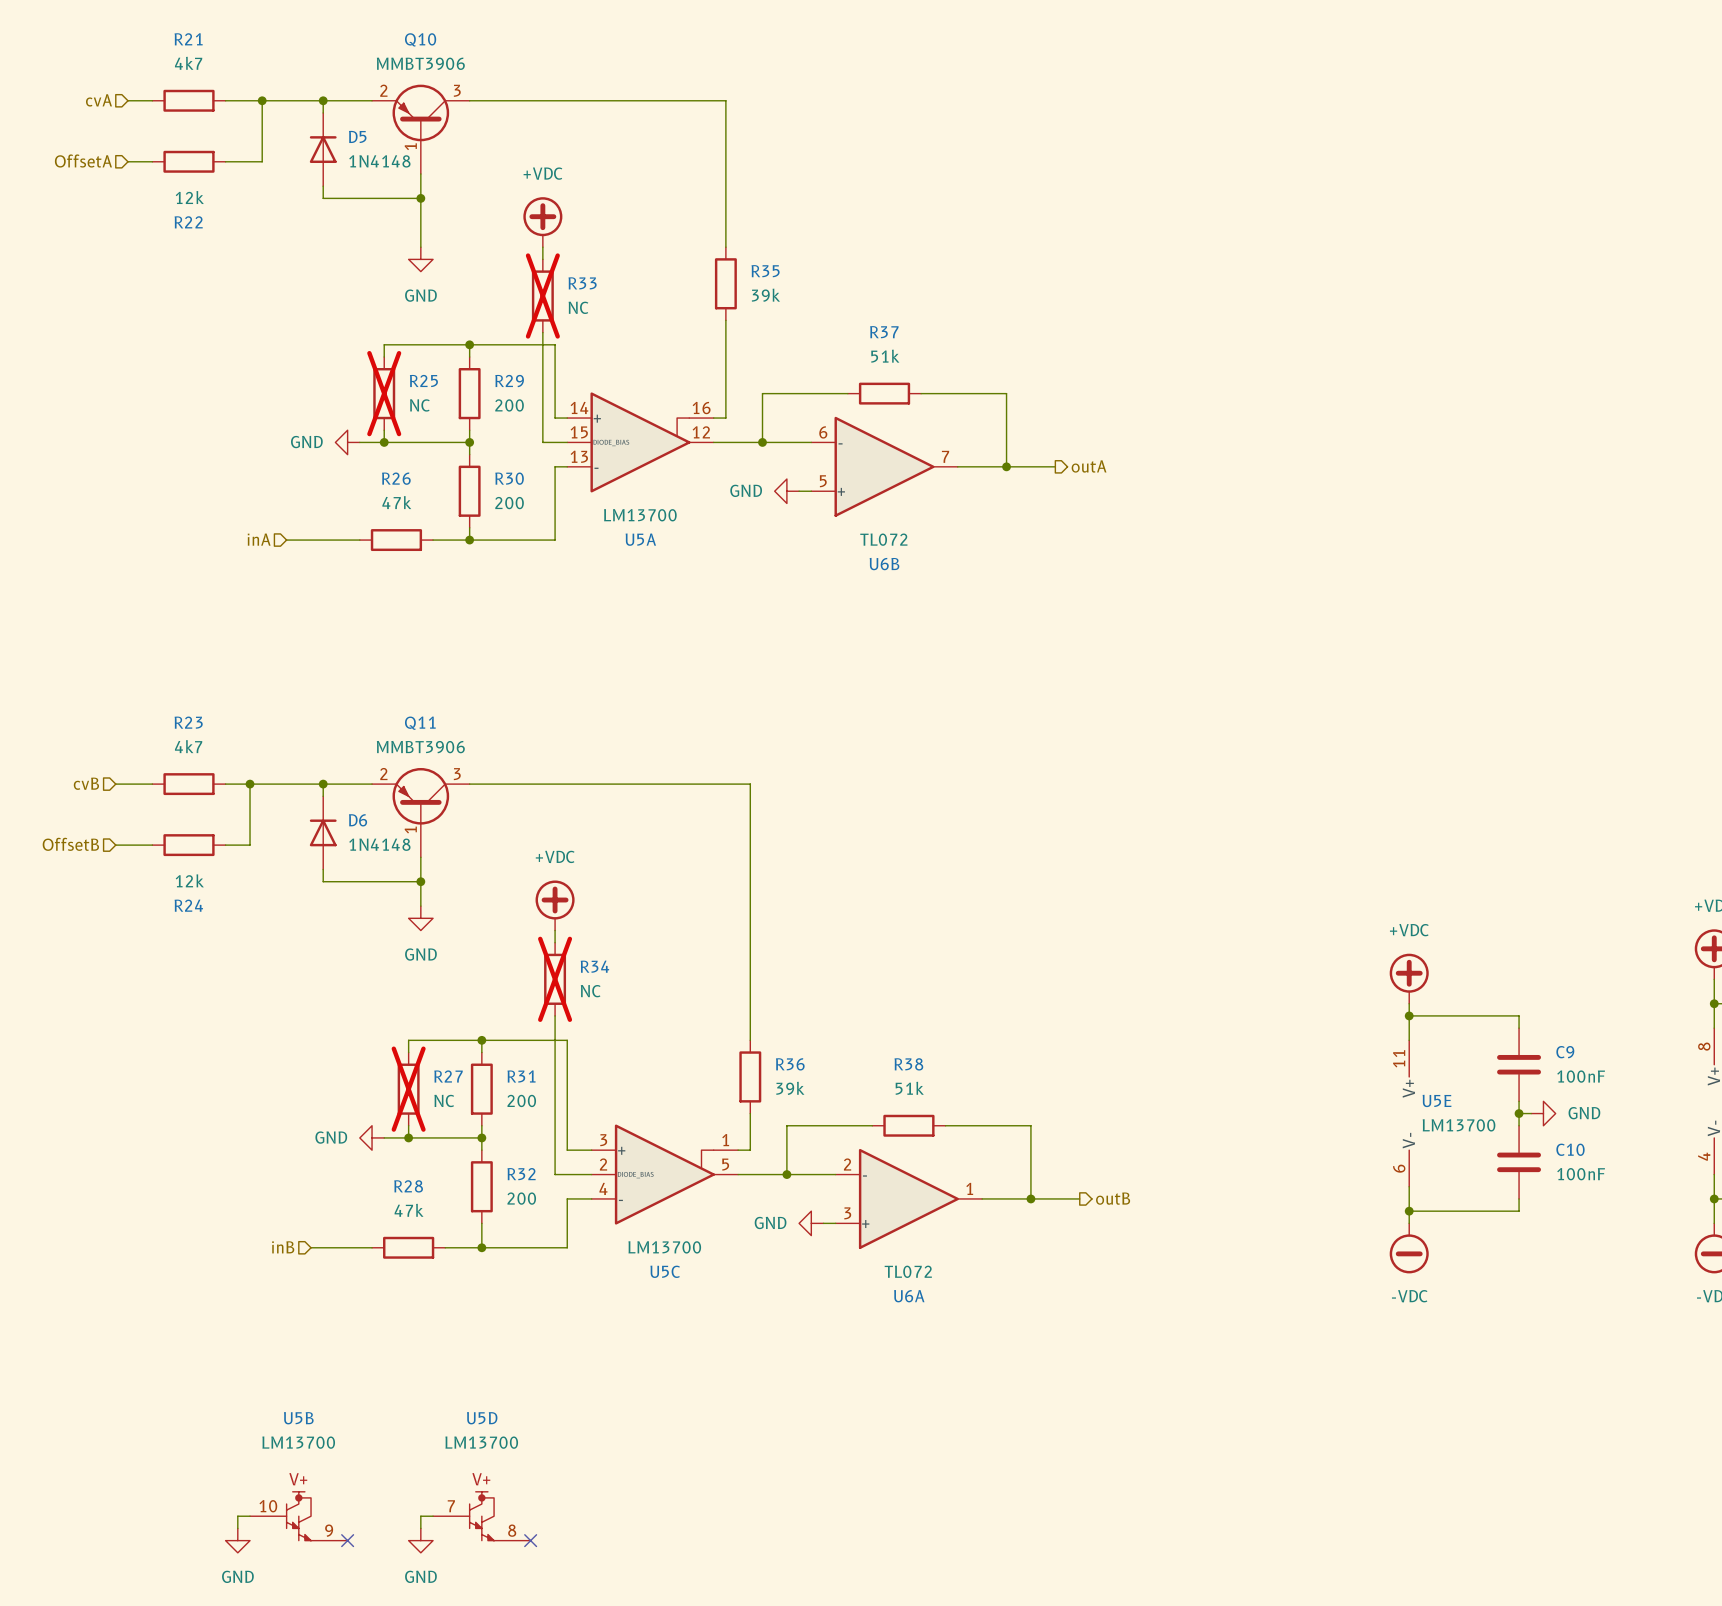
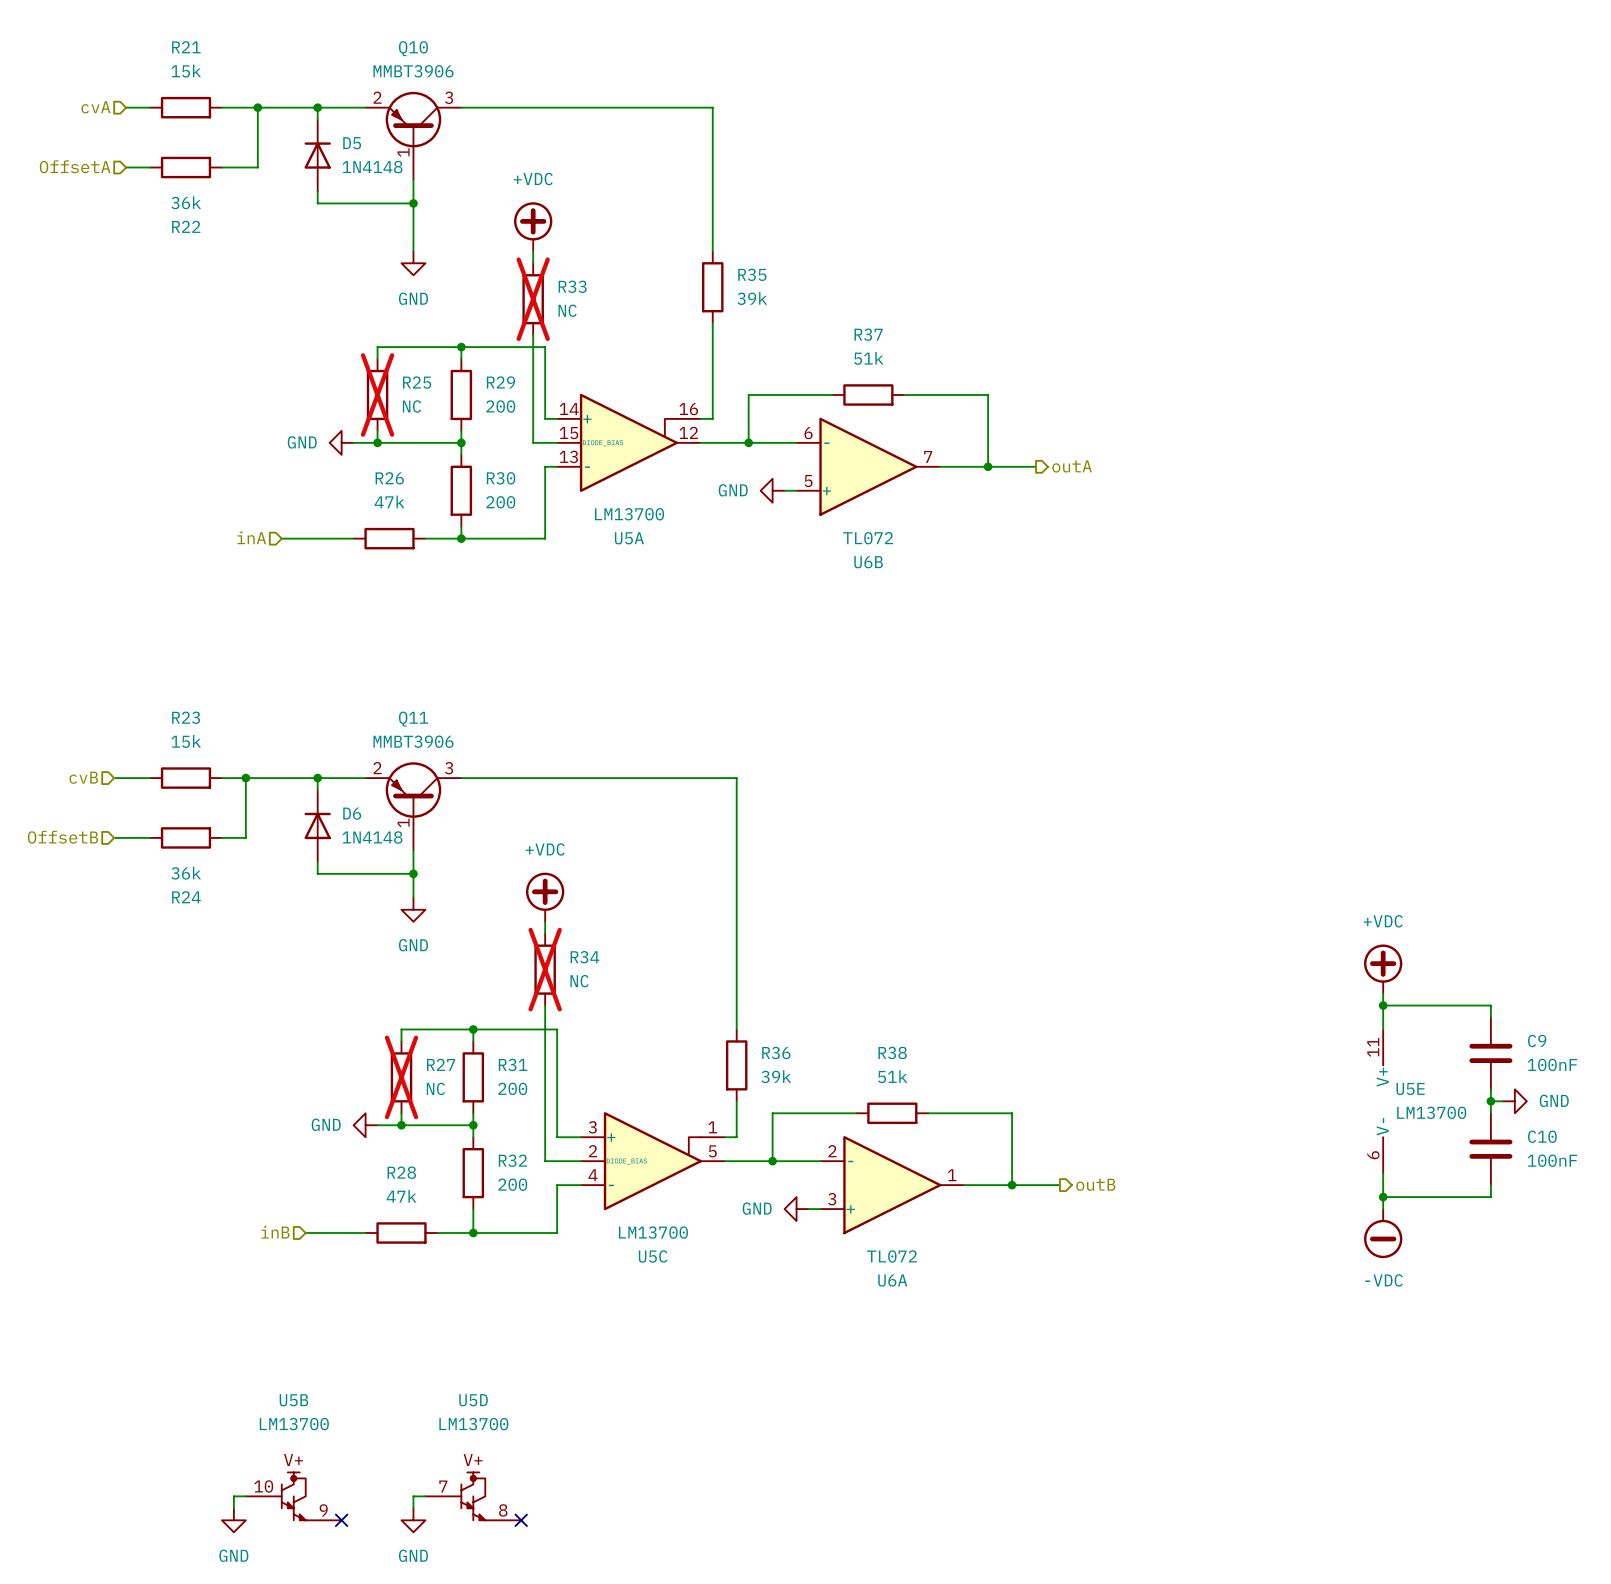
R21 value: 4k7 (188, 63) -> 15k (186, 71)
R22 value: 12k (189, 197) -> 36k (186, 202)
R23 value: 4k7 (188, 746) -> 15k (186, 741)
R24 value: 12k (189, 880) -> 36k (186, 873)

